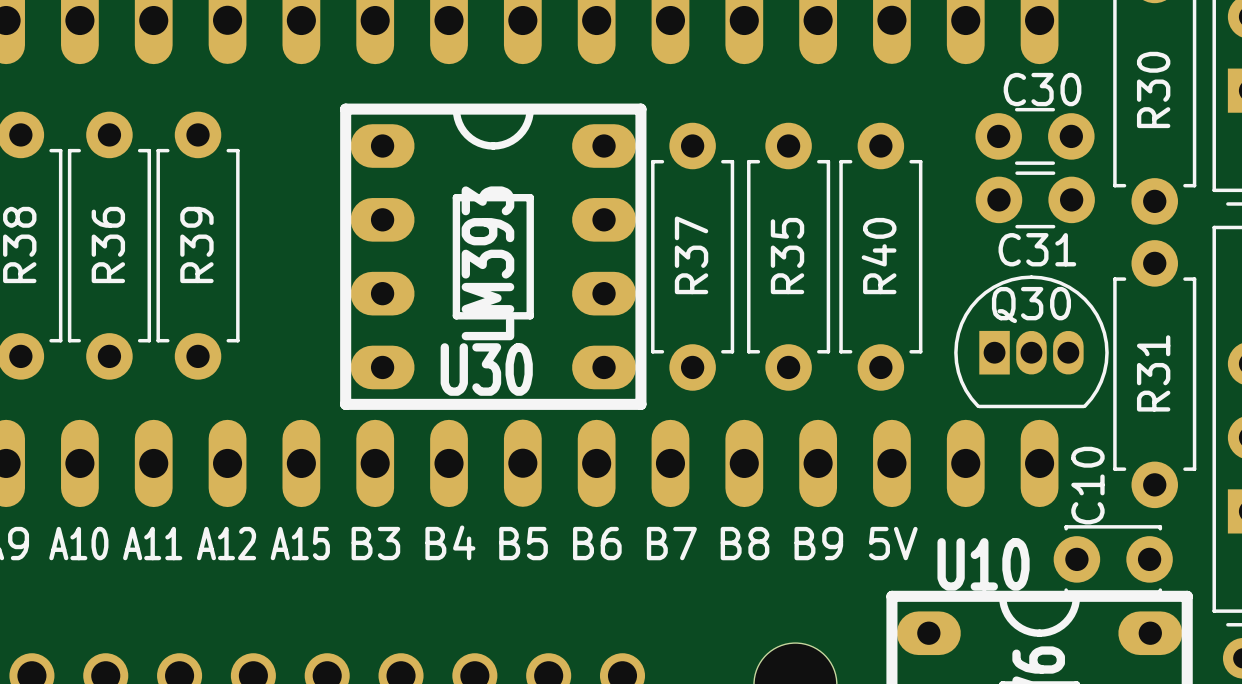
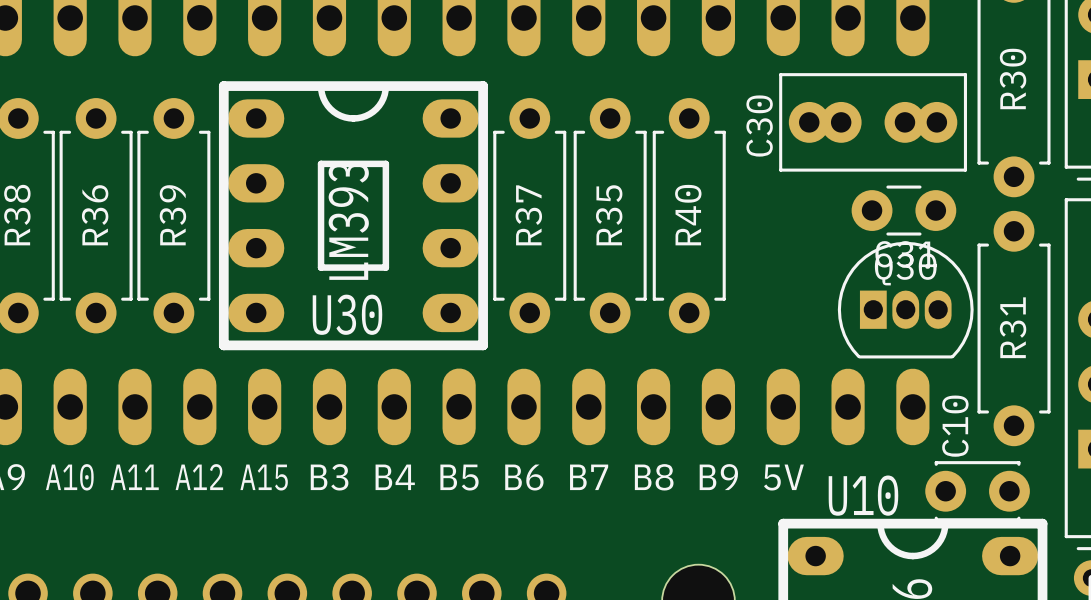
C30 name position: C30 (1042, 89) -> C30 (759, 126)
C30 footprint: [975, 107, 1095, 165] -> [779, 73, 967, 172]
C31 position: (1035, 199) -> (903, 210)
U30 position: (493, 256) -> (353, 215)
R37 position: (692, 256) -> (529, 215)
R35 position: (788, 256) -> (610, 215)
R40 position: (880, 256) -> (689, 215)

